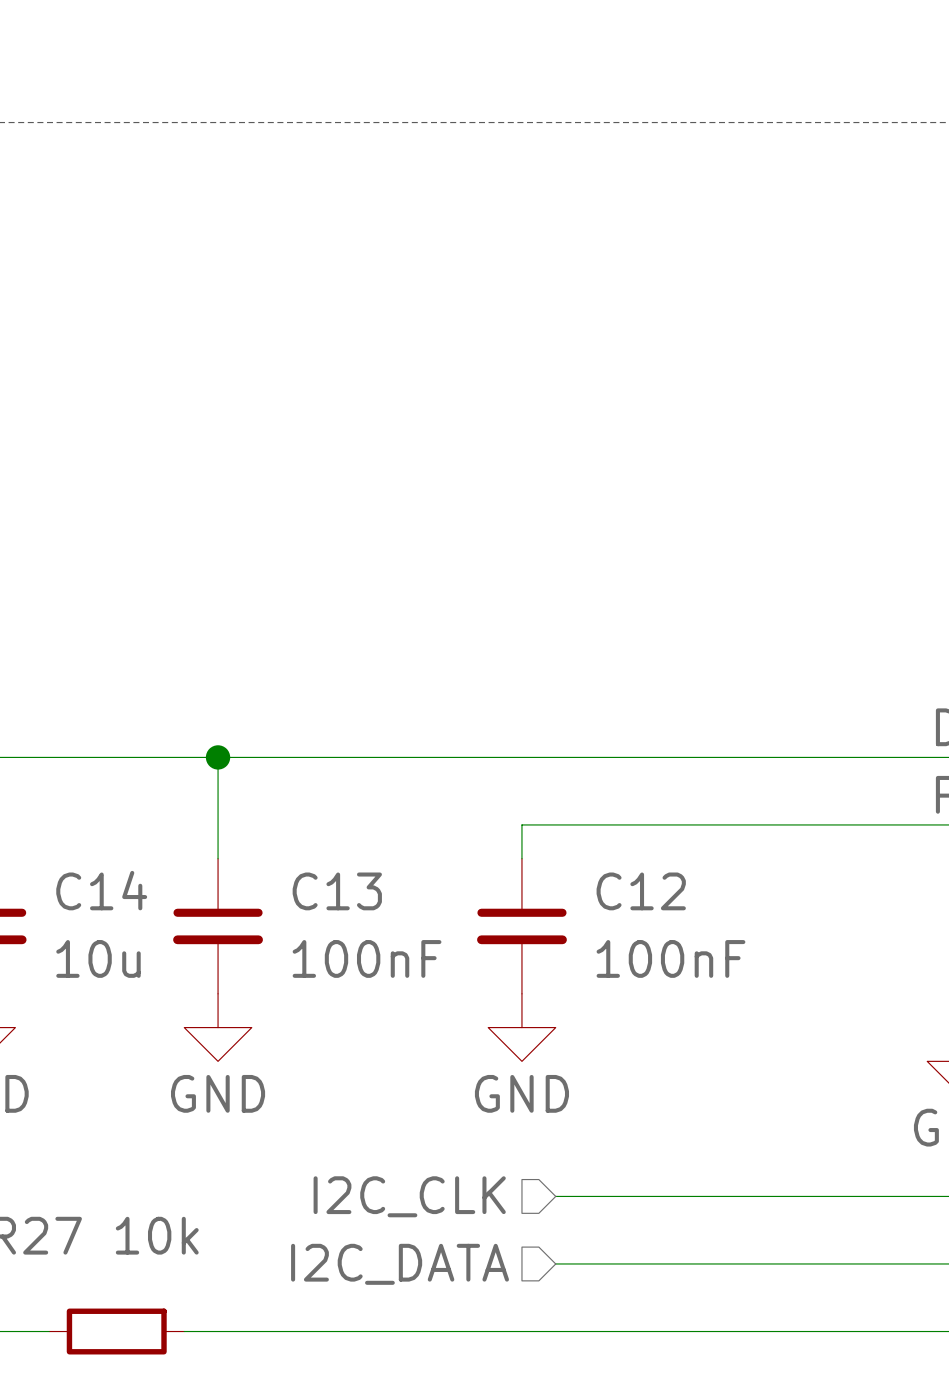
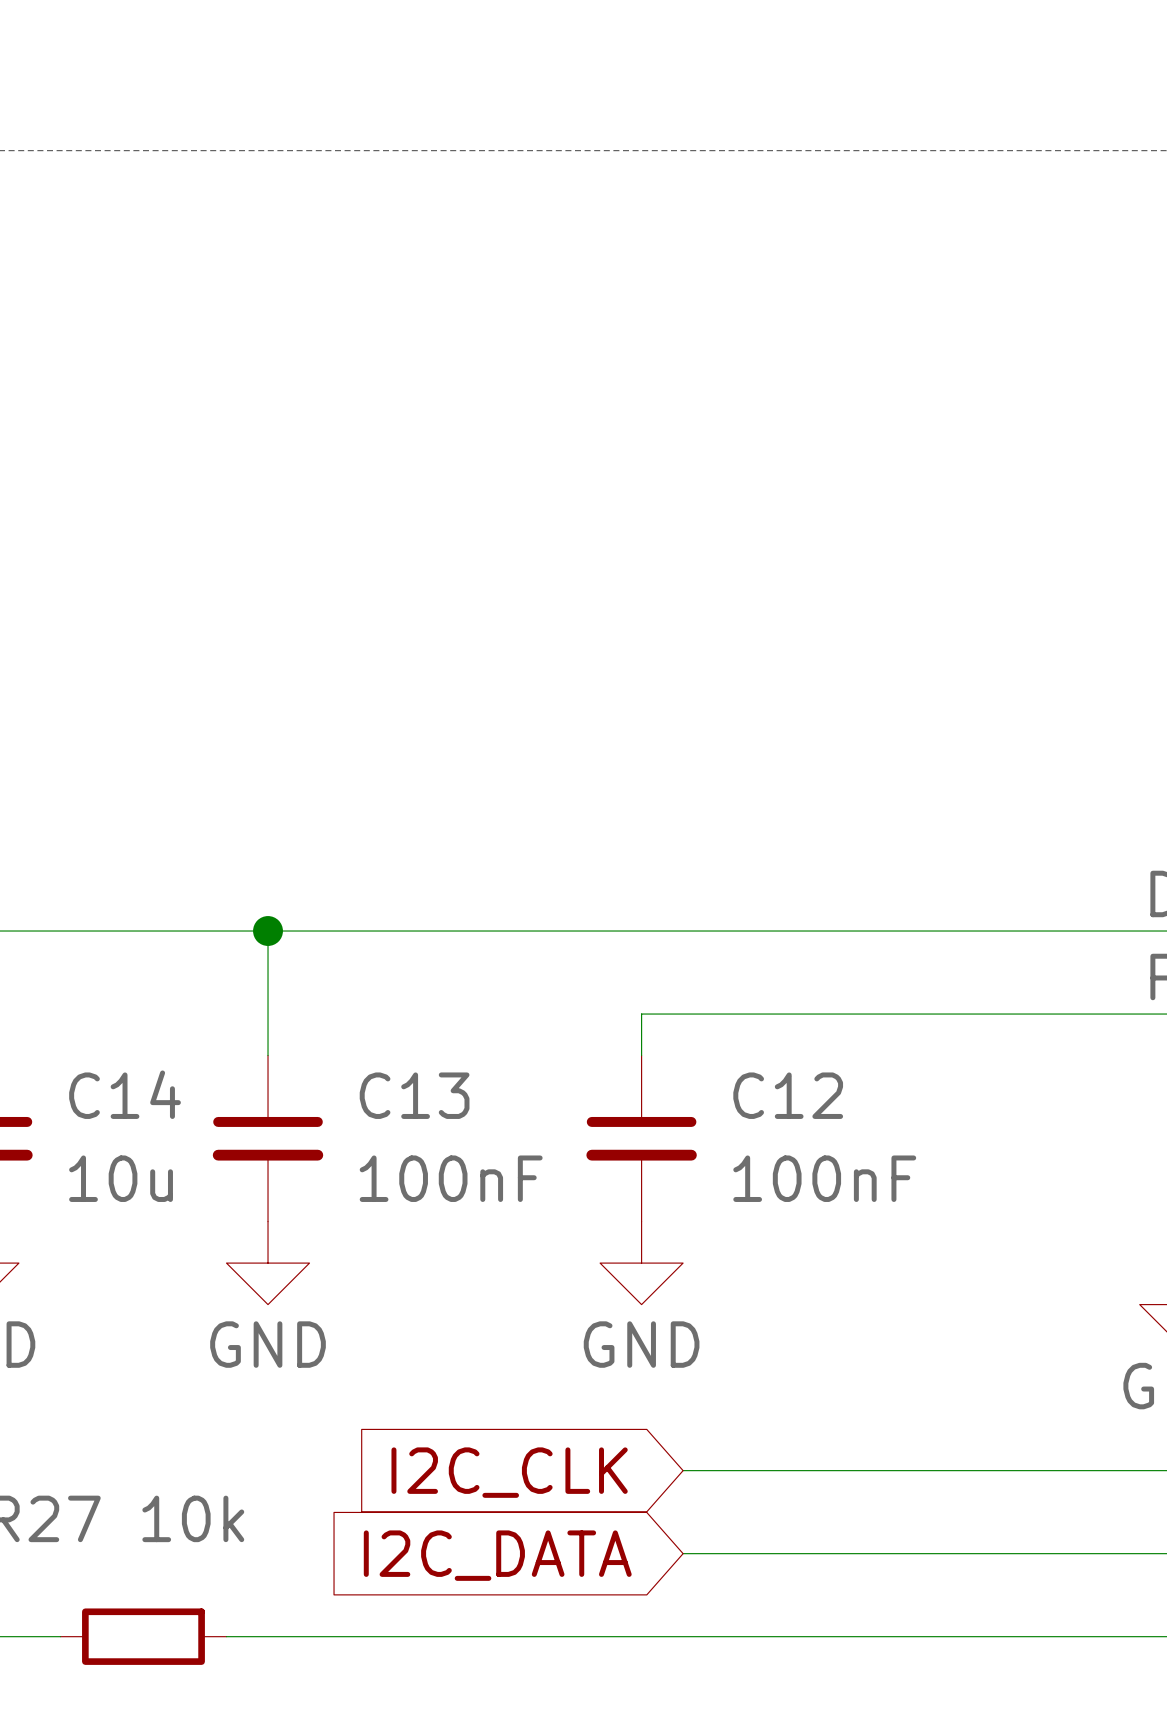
hierarchical label: I2C_CLK (409, 1196) -> none
global label: none -> I2C_CLK (509, 1472)
hierarchical label: I2C_DATA (400, 1264) -> none
global label: none -> I2C_DATA (497, 1555)

